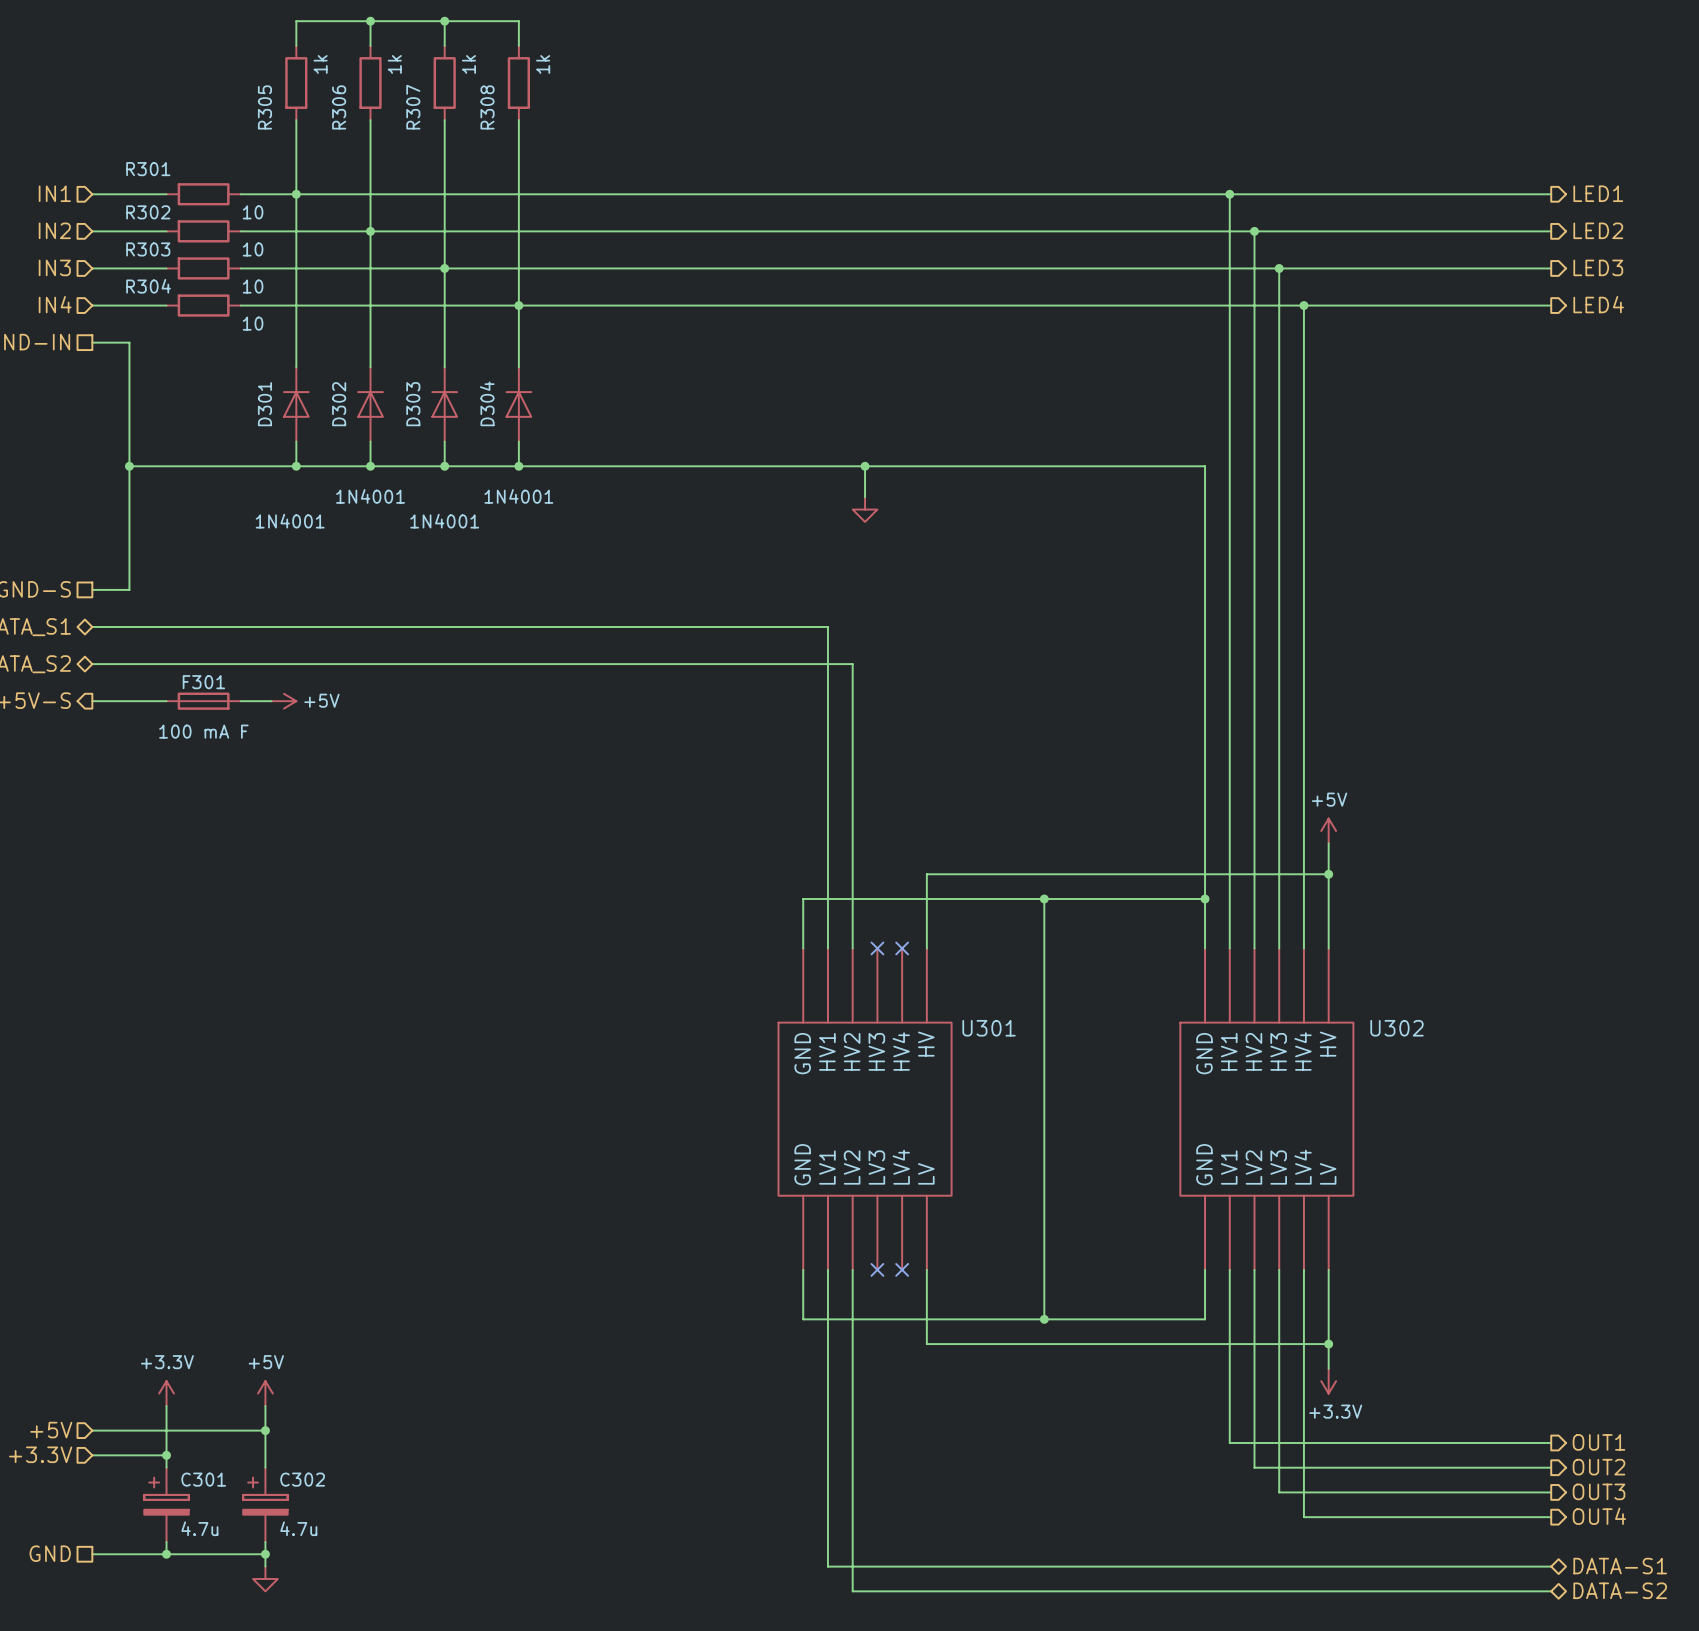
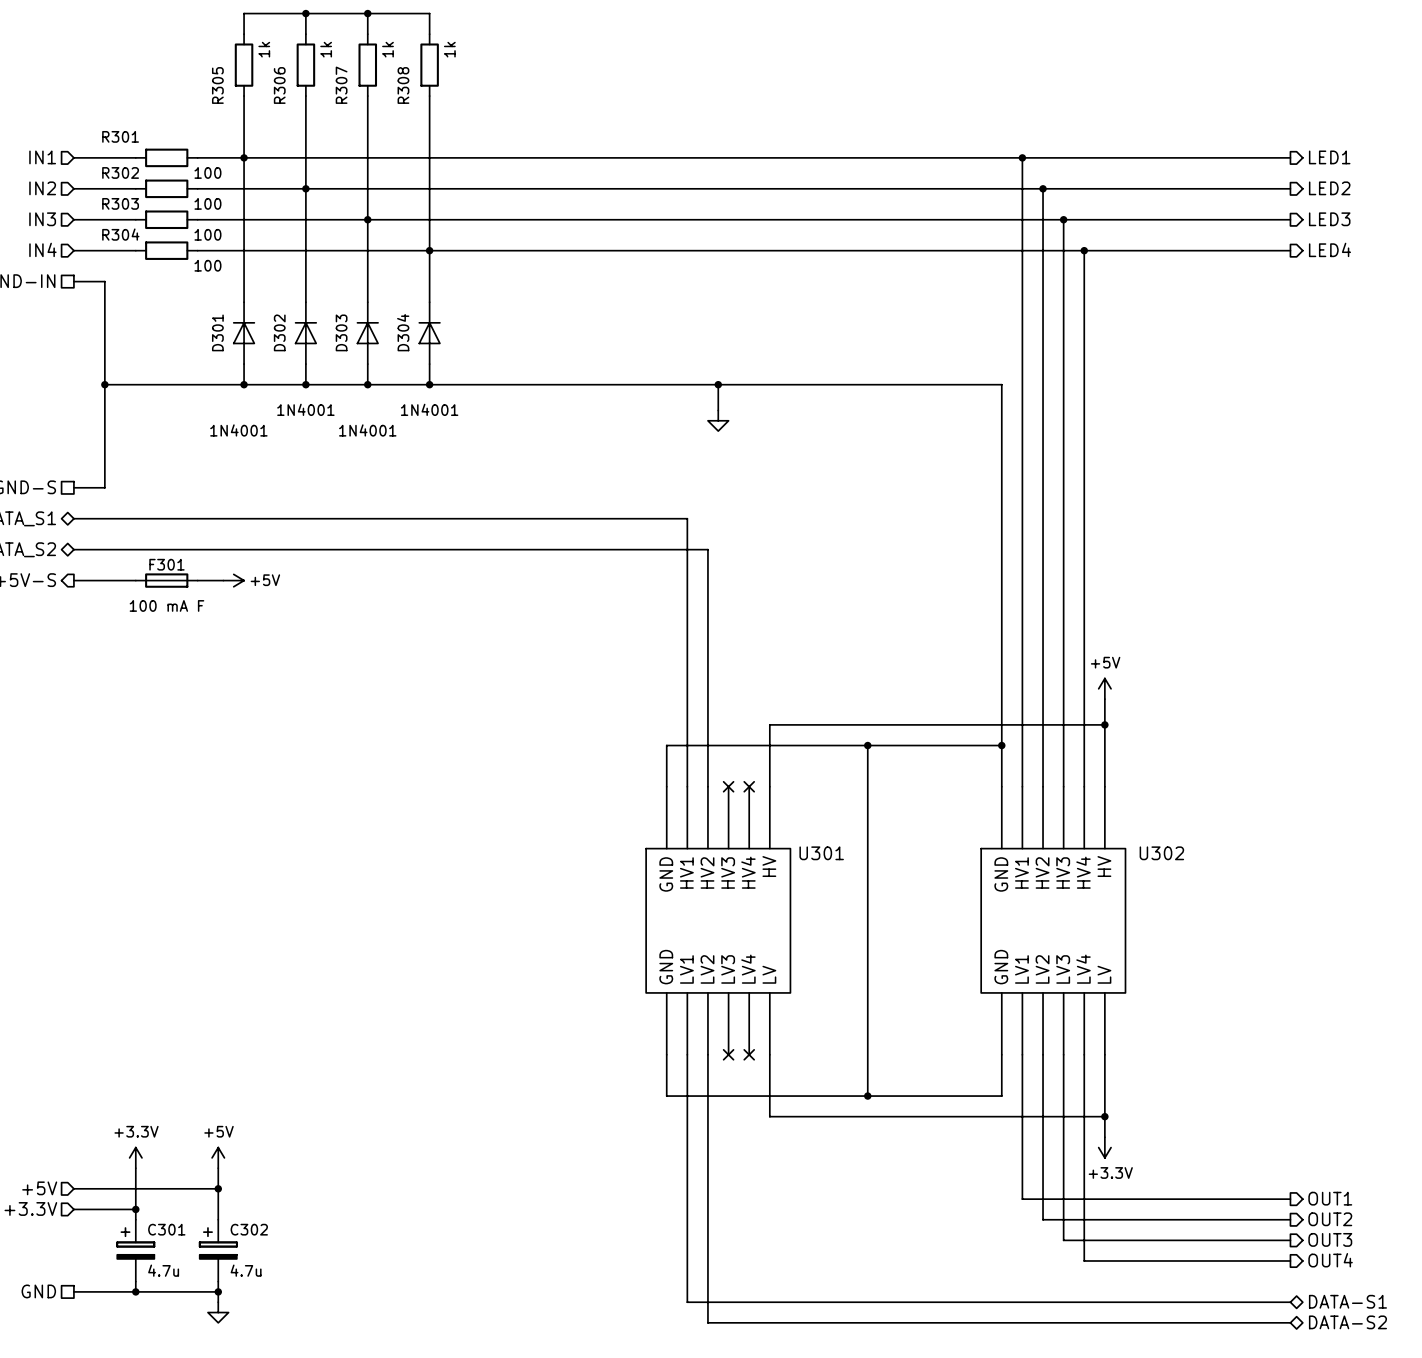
R301 value: 10 (253, 212) -> 100 (207, 172)
R302 value: 10 (253, 249) -> 100 (207, 203)
R303 value: 10 (253, 286) -> 100 (207, 234)
R304 value: 10 (253, 323) -> 100 (207, 265)

